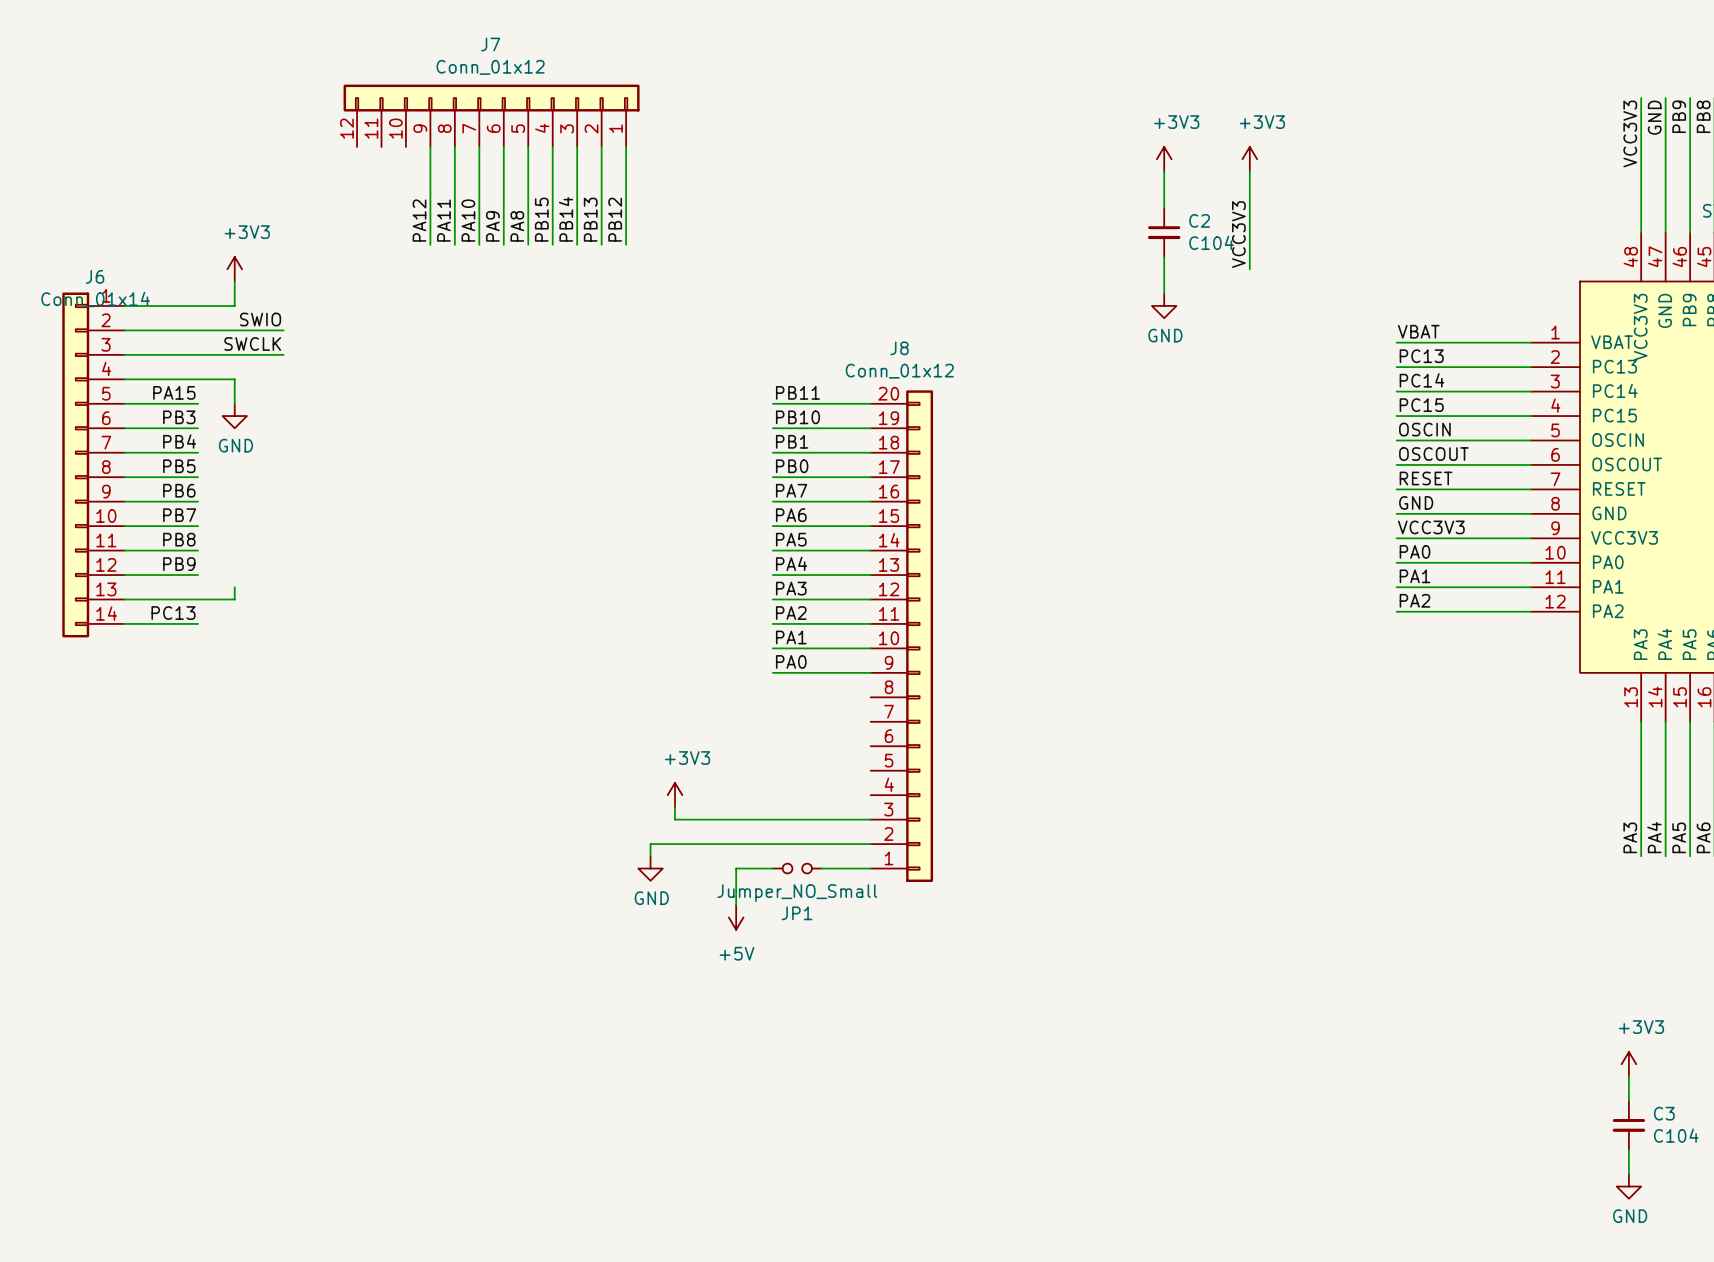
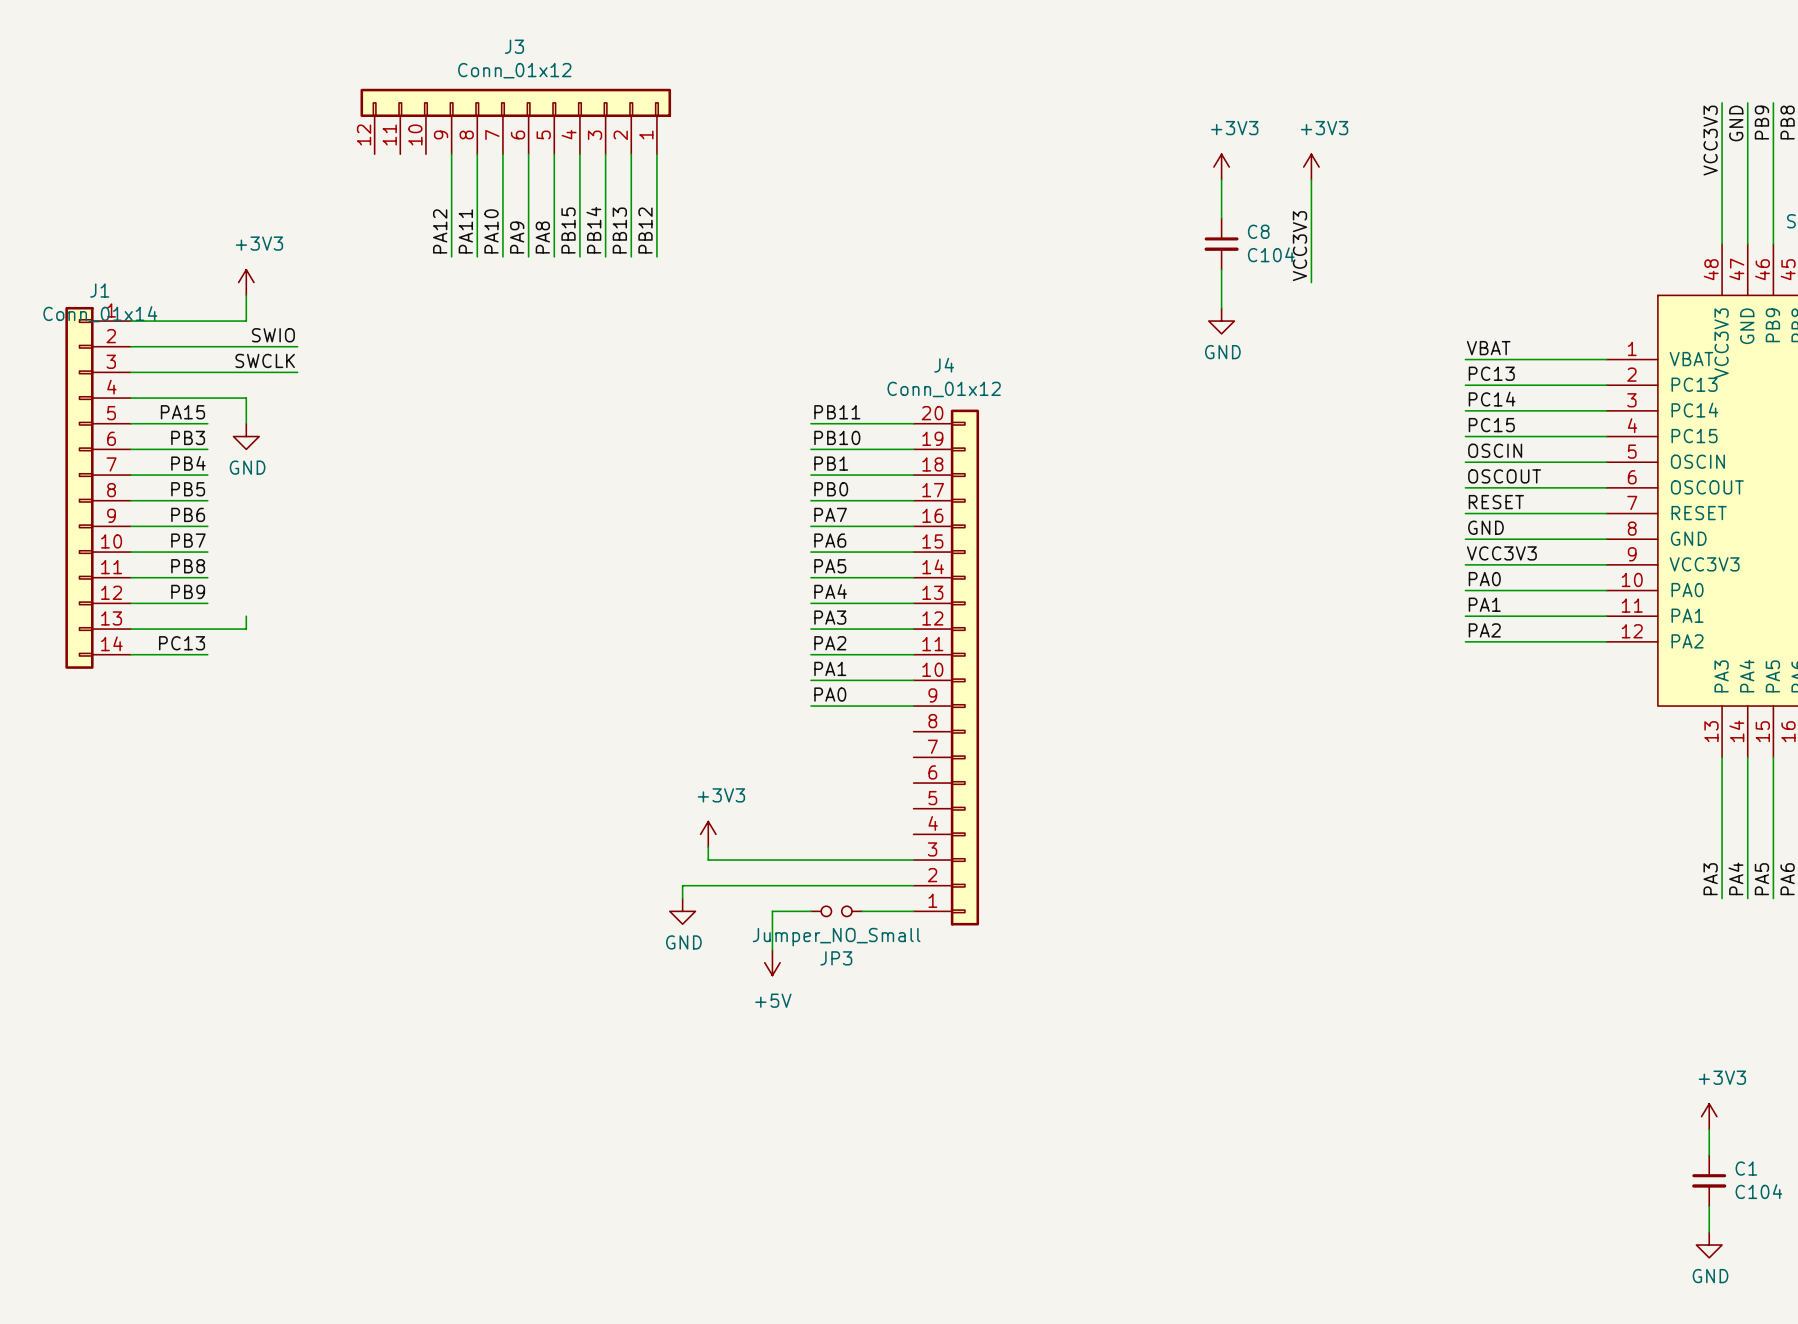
J7 name: J7 (490, 44) -> J3 (514, 46)
C2 name: C2 (1199, 220) -> C8 (1258, 231)
J6 name: J6 (95, 276) -> J1 (99, 290)
J8 name: J8 (899, 348) -> J4 (944, 365)
JP1 name: JP1 (797, 913) -> JP3 (836, 958)
C3 name: C3 (1664, 1113) -> C1 (1746, 1168)

